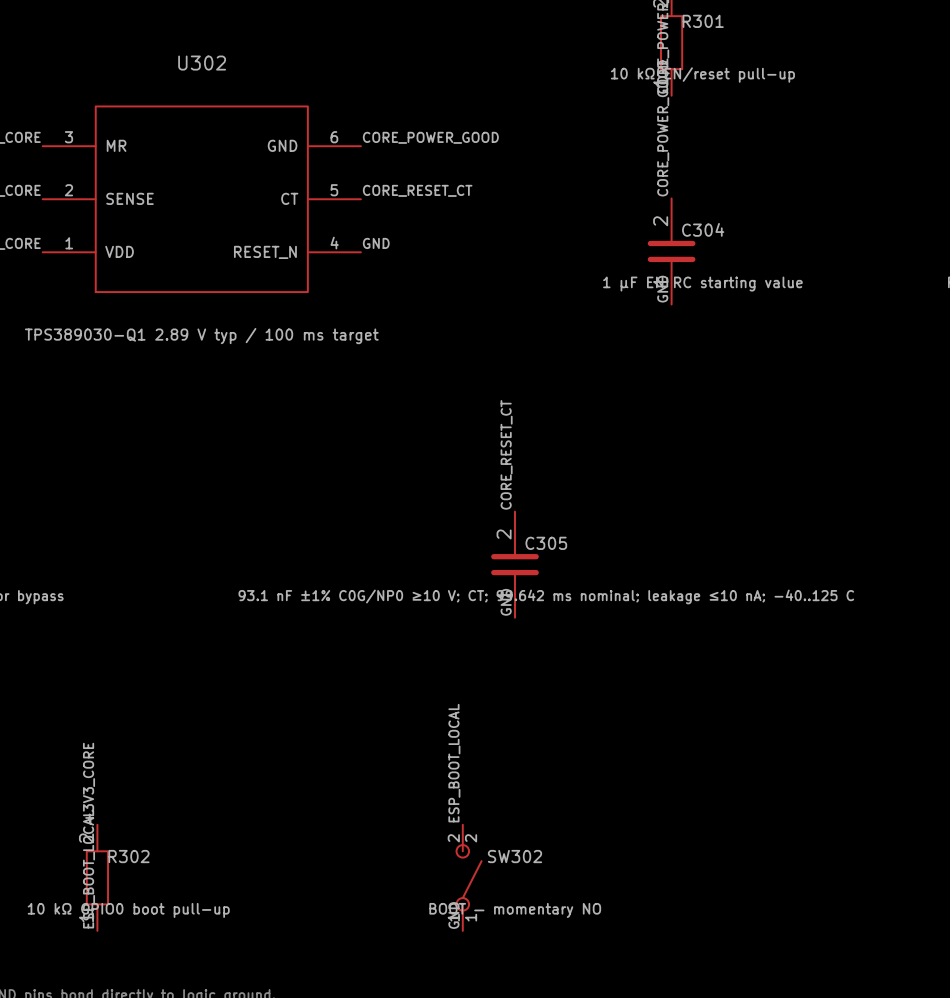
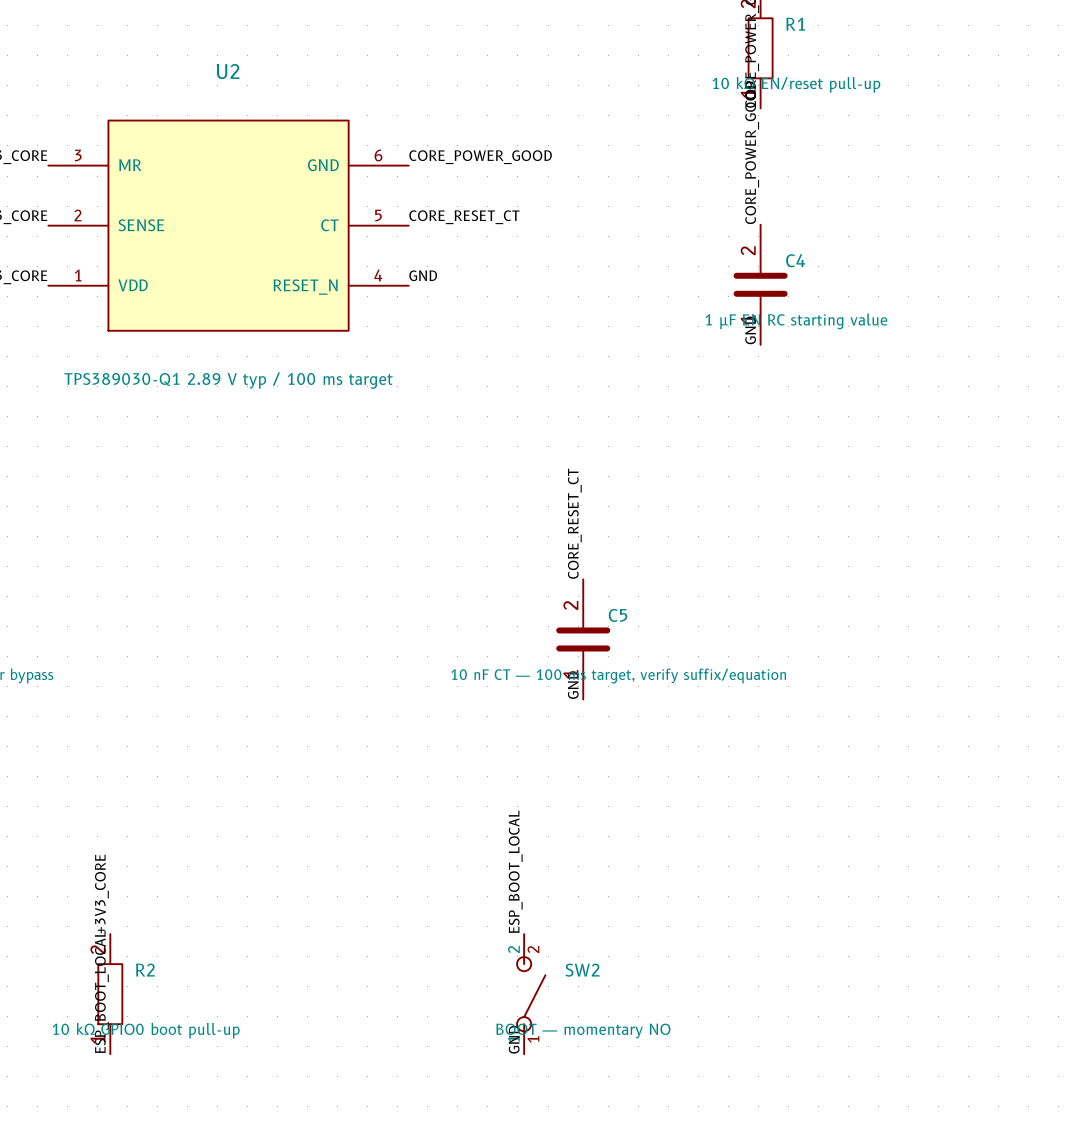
R301 name: R301 (703, 21) -> R1 (795, 24)
U302 name: U302 (202, 63) -> U2 (228, 71)
C304 name: C304 (703, 229) -> C4 (795, 260)
C305 name: C305 (546, 543) -> C5 (618, 615)
C305 value: 93.1 nF ±1% C0G/NP0 ≥10 V; CT; 99.642 ms nominal; leakage ≤10 nA; -40..125 C (546, 596) -> 10 nF CT — 100 ms target, verify suffix/equation (618, 676)
R302 name: R302 (129, 856) -> R2 (145, 970)
SW302 name: SW302 (514, 856) -> SW2 (582, 970)

